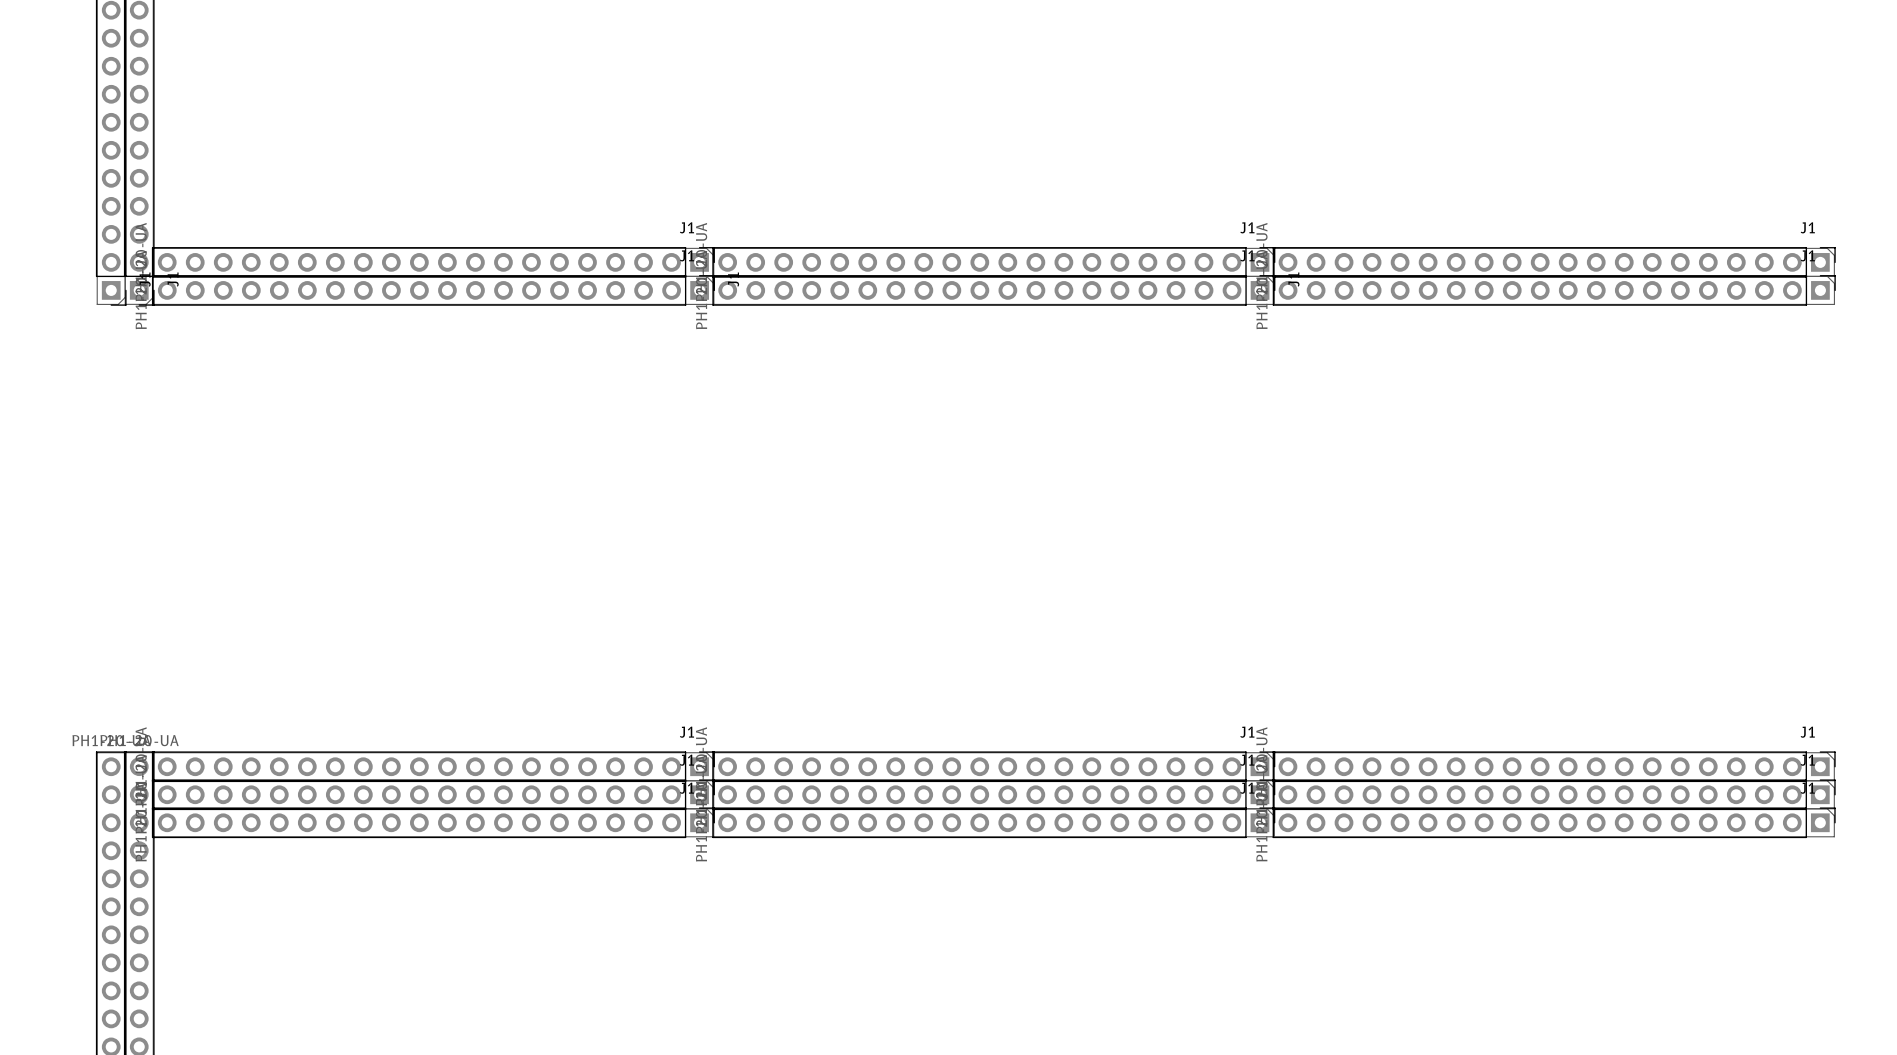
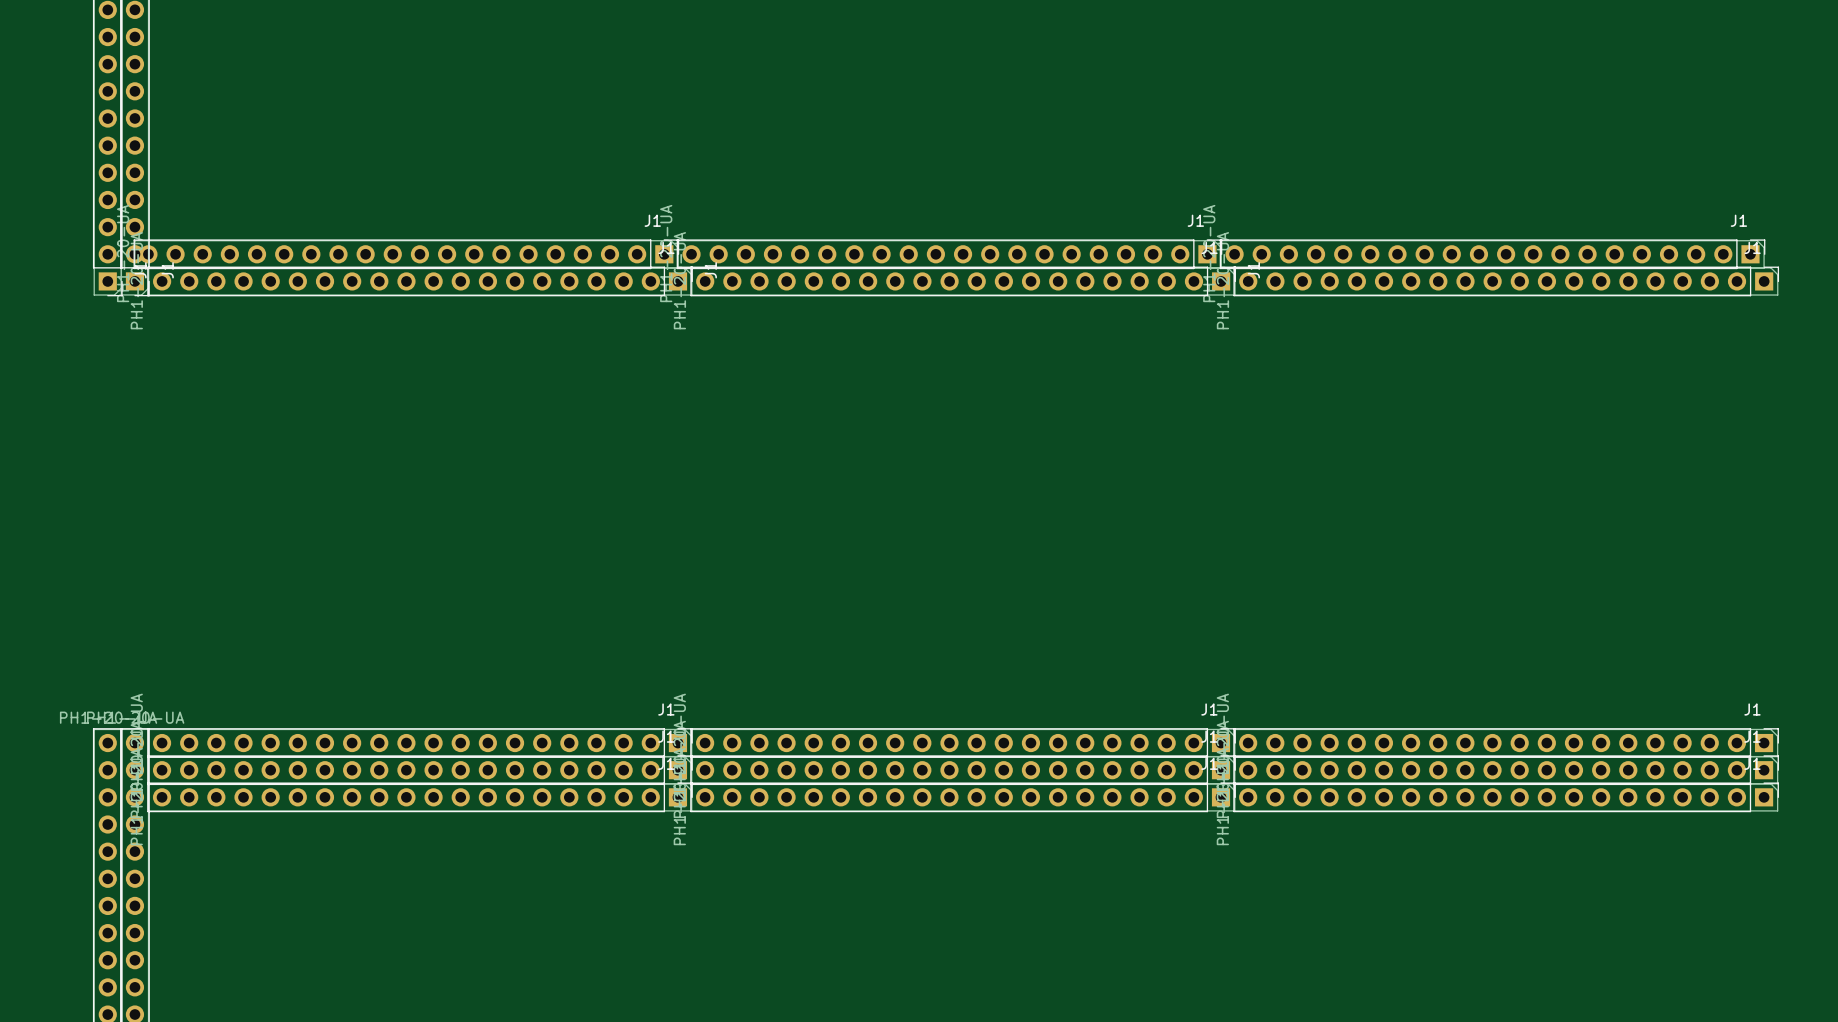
J1 position: (433, 262) -> (406, 254)
J1 position: (993, 262) -> (949, 254)
J1 position: (1554, 262) -> (1492, 254)

